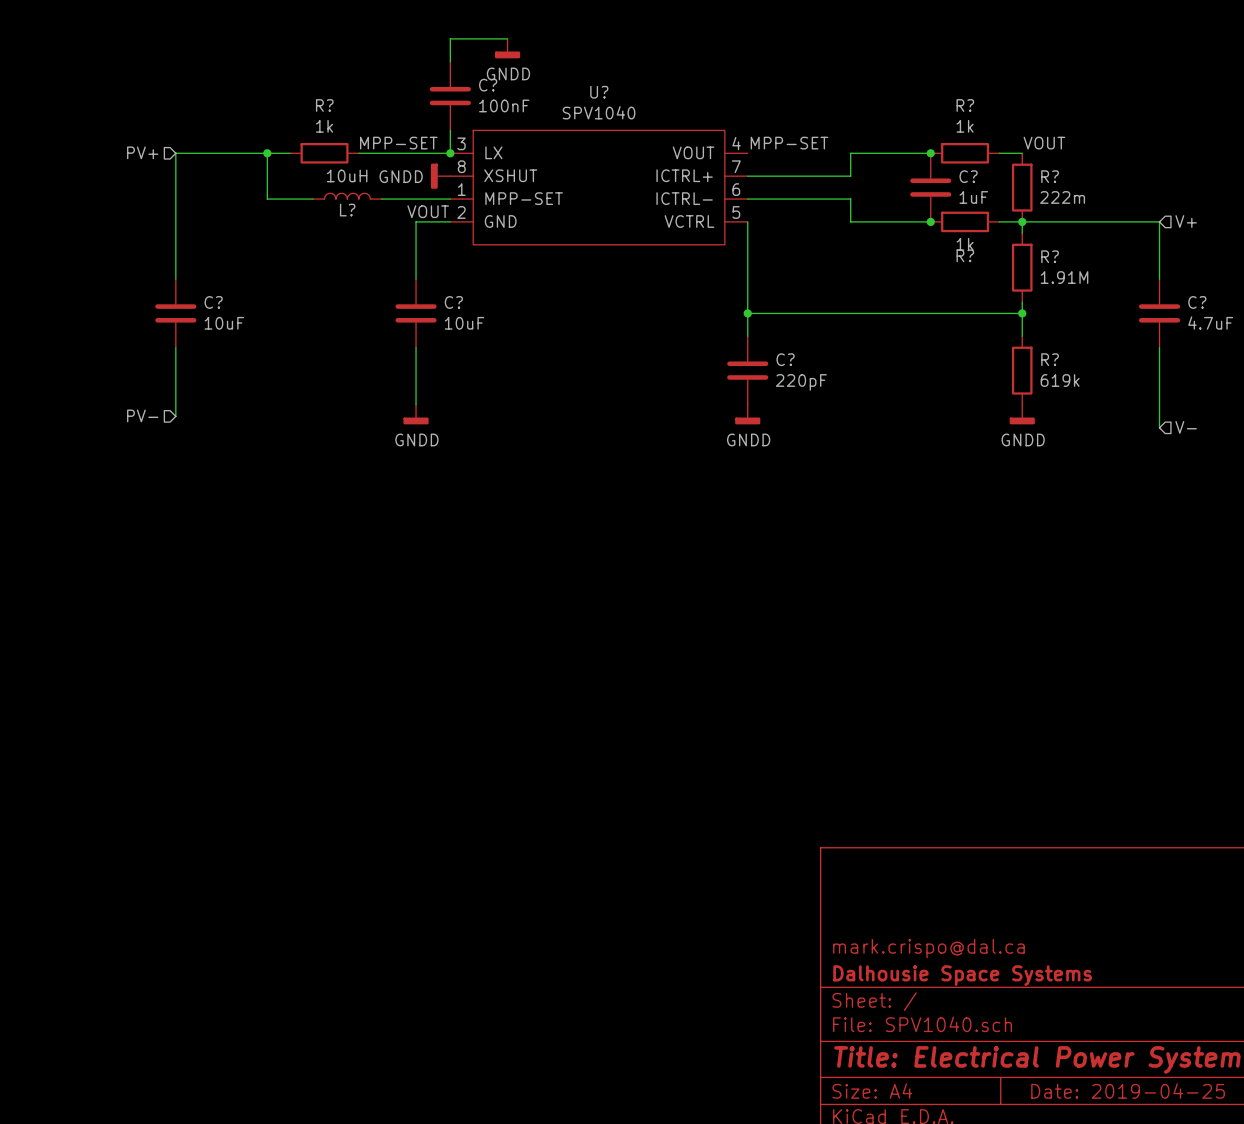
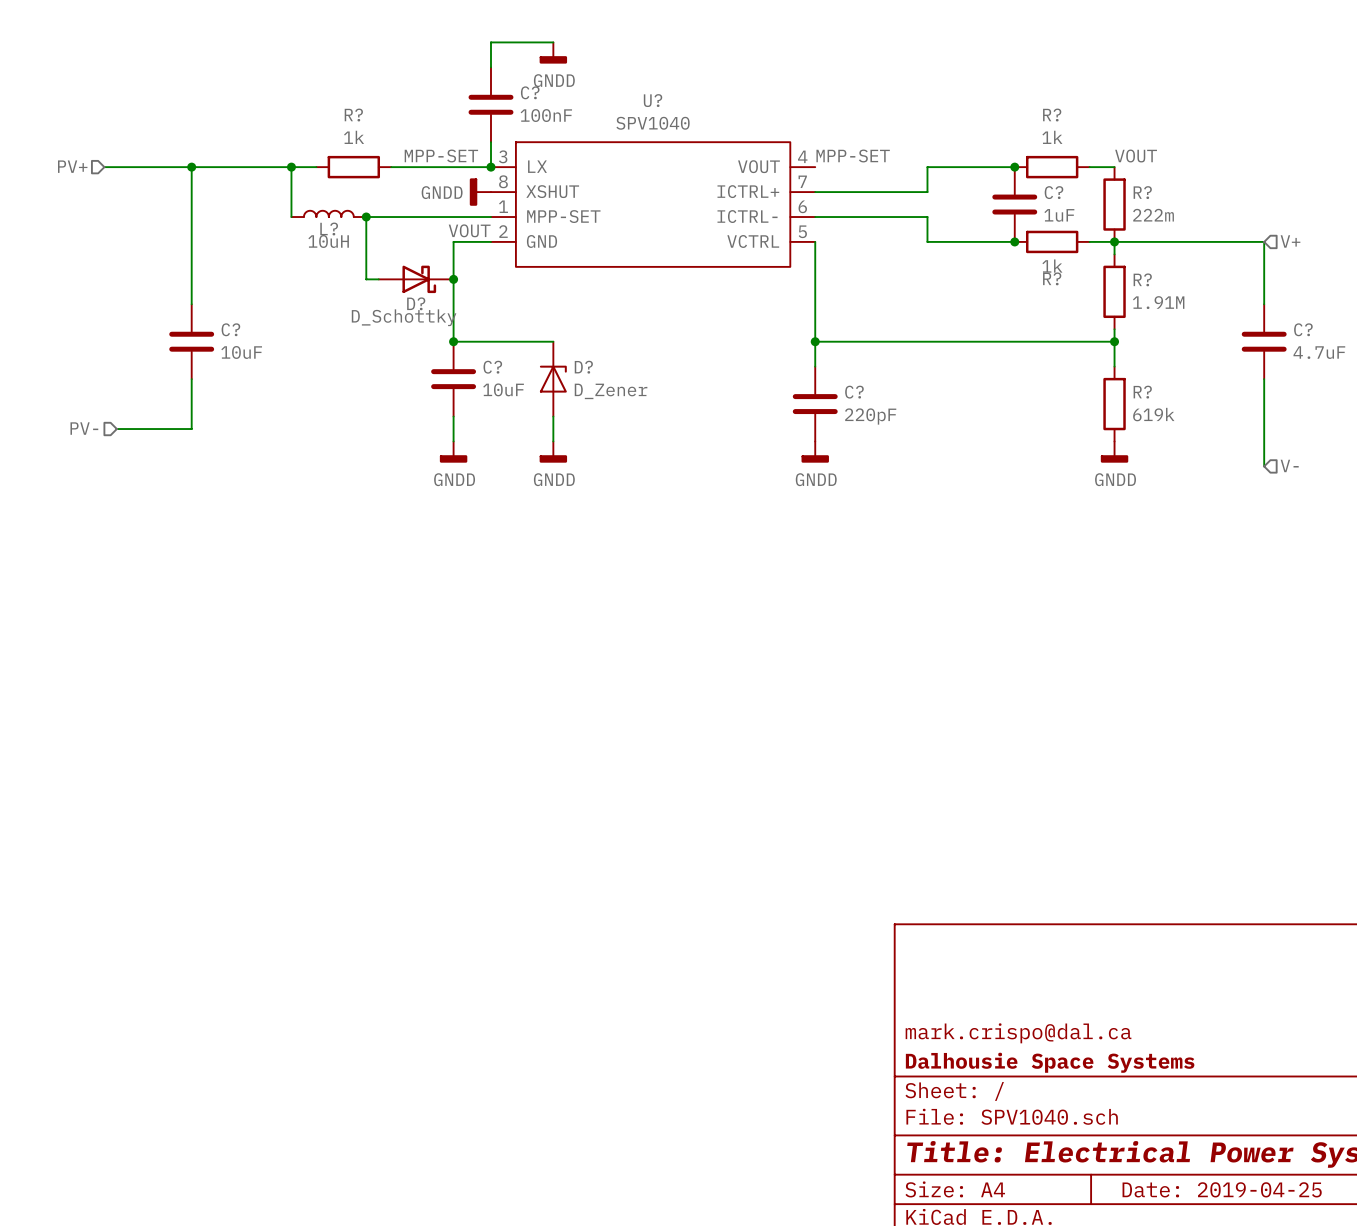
hierarchical label position: PV+ (142, 152) -> PV+ (72, 166)
wire: none -> (104, 167) (191, 167)
junction: none -> (191, 167)
L? value position: 10uH (347, 175) -> 10uH (328, 241)
L? position: (347, 196) -> (328, 213)
wire: (267, 199) (313, 199) -> none
junction: none -> (366, 217)
wire: none -> (416, 217) (366, 217) (366, 279) (378, 279)
D?: none -> D_Schottky (416, 279)
junction: none -> (453, 279)
wire: none -> (453, 304) (453, 341) (553, 341)
C? position: (416, 313) -> (453, 379)
junction: none -> (453, 341)
D?: none -> D_Zener (553, 379)
wire: none -> (553, 416) (553, 441)
wire: (175, 393) (175, 416) -> (191, 429) (116, 429)
power symbol: none -> GNDD (553, 452)
hierarchical label position: PV- (142, 415) -> PV- (84, 428)

